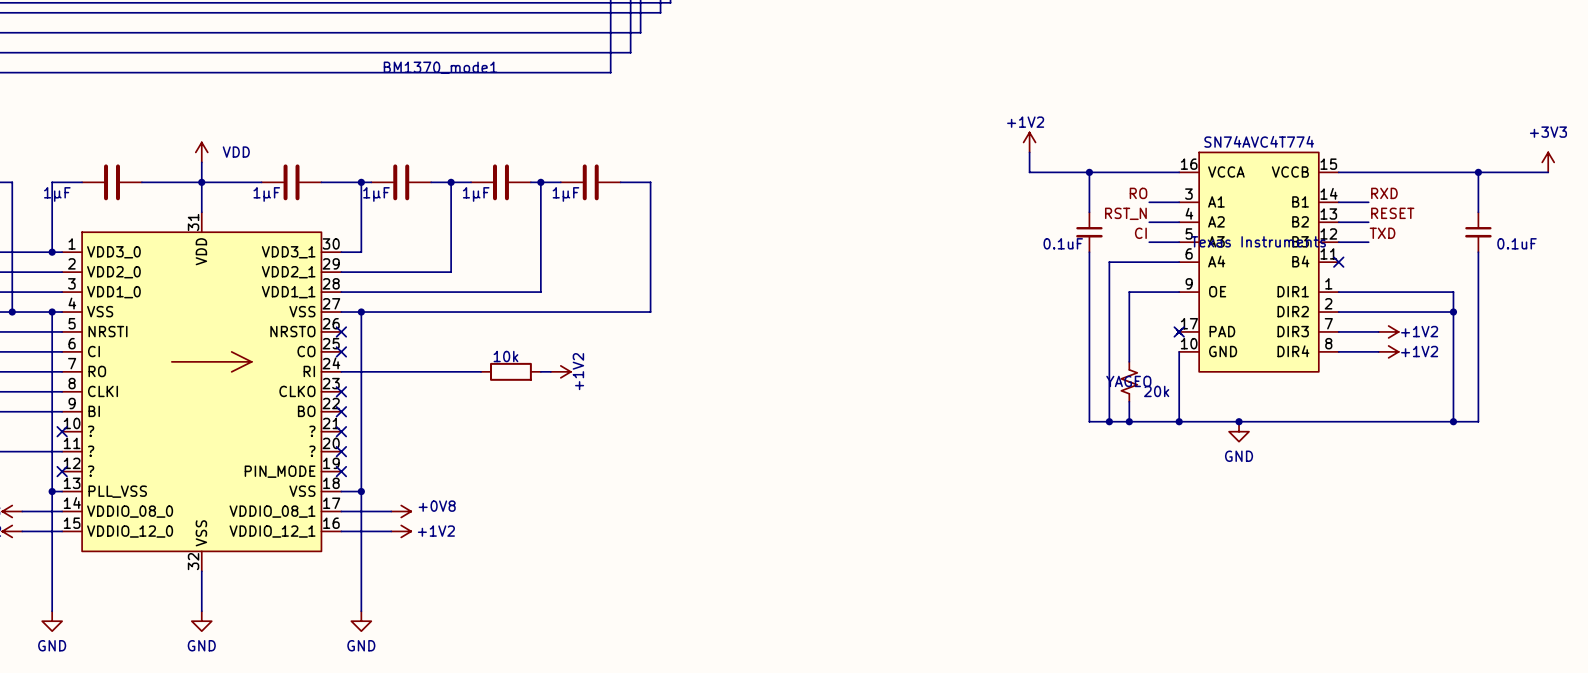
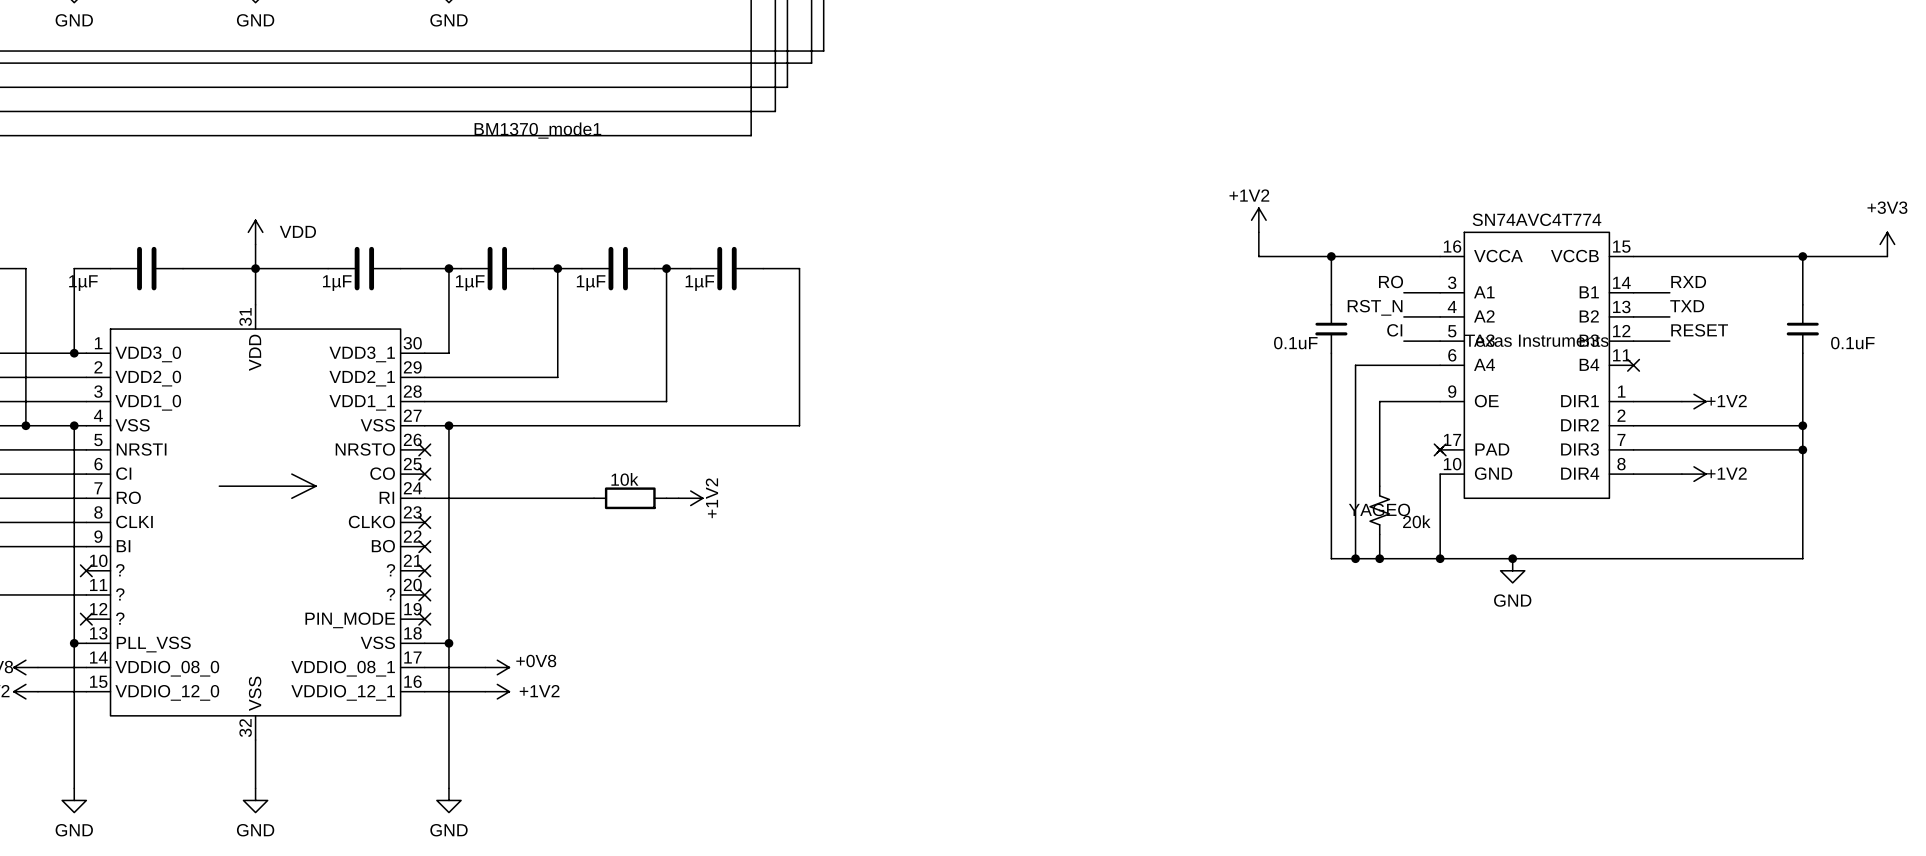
label: RESET (1392, 213) -> TXD (1687, 306)
label: TXD (1382, 233) -> RESET (1699, 330)
wire: (1378, 292) (1453, 292) (1453, 421) -> none
wire: none -> (1772, 425) (1802, 425)
junction: (1453, 312) -> none
junction: none -> (1802, 425)
wire: none -> (1681, 449) (1802, 449)
power symbol position: +1V2 (1388, 331) -> +1V2 (1694, 401)
junction: none -> (1802, 449)
junction: (1453, 421) -> none

